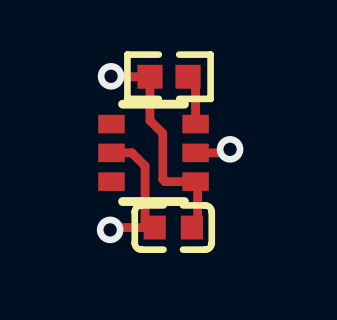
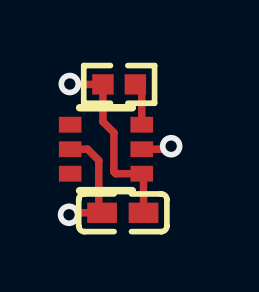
part footprint: [131, 202, 216, 253] -> [75, 191, 170, 235]

